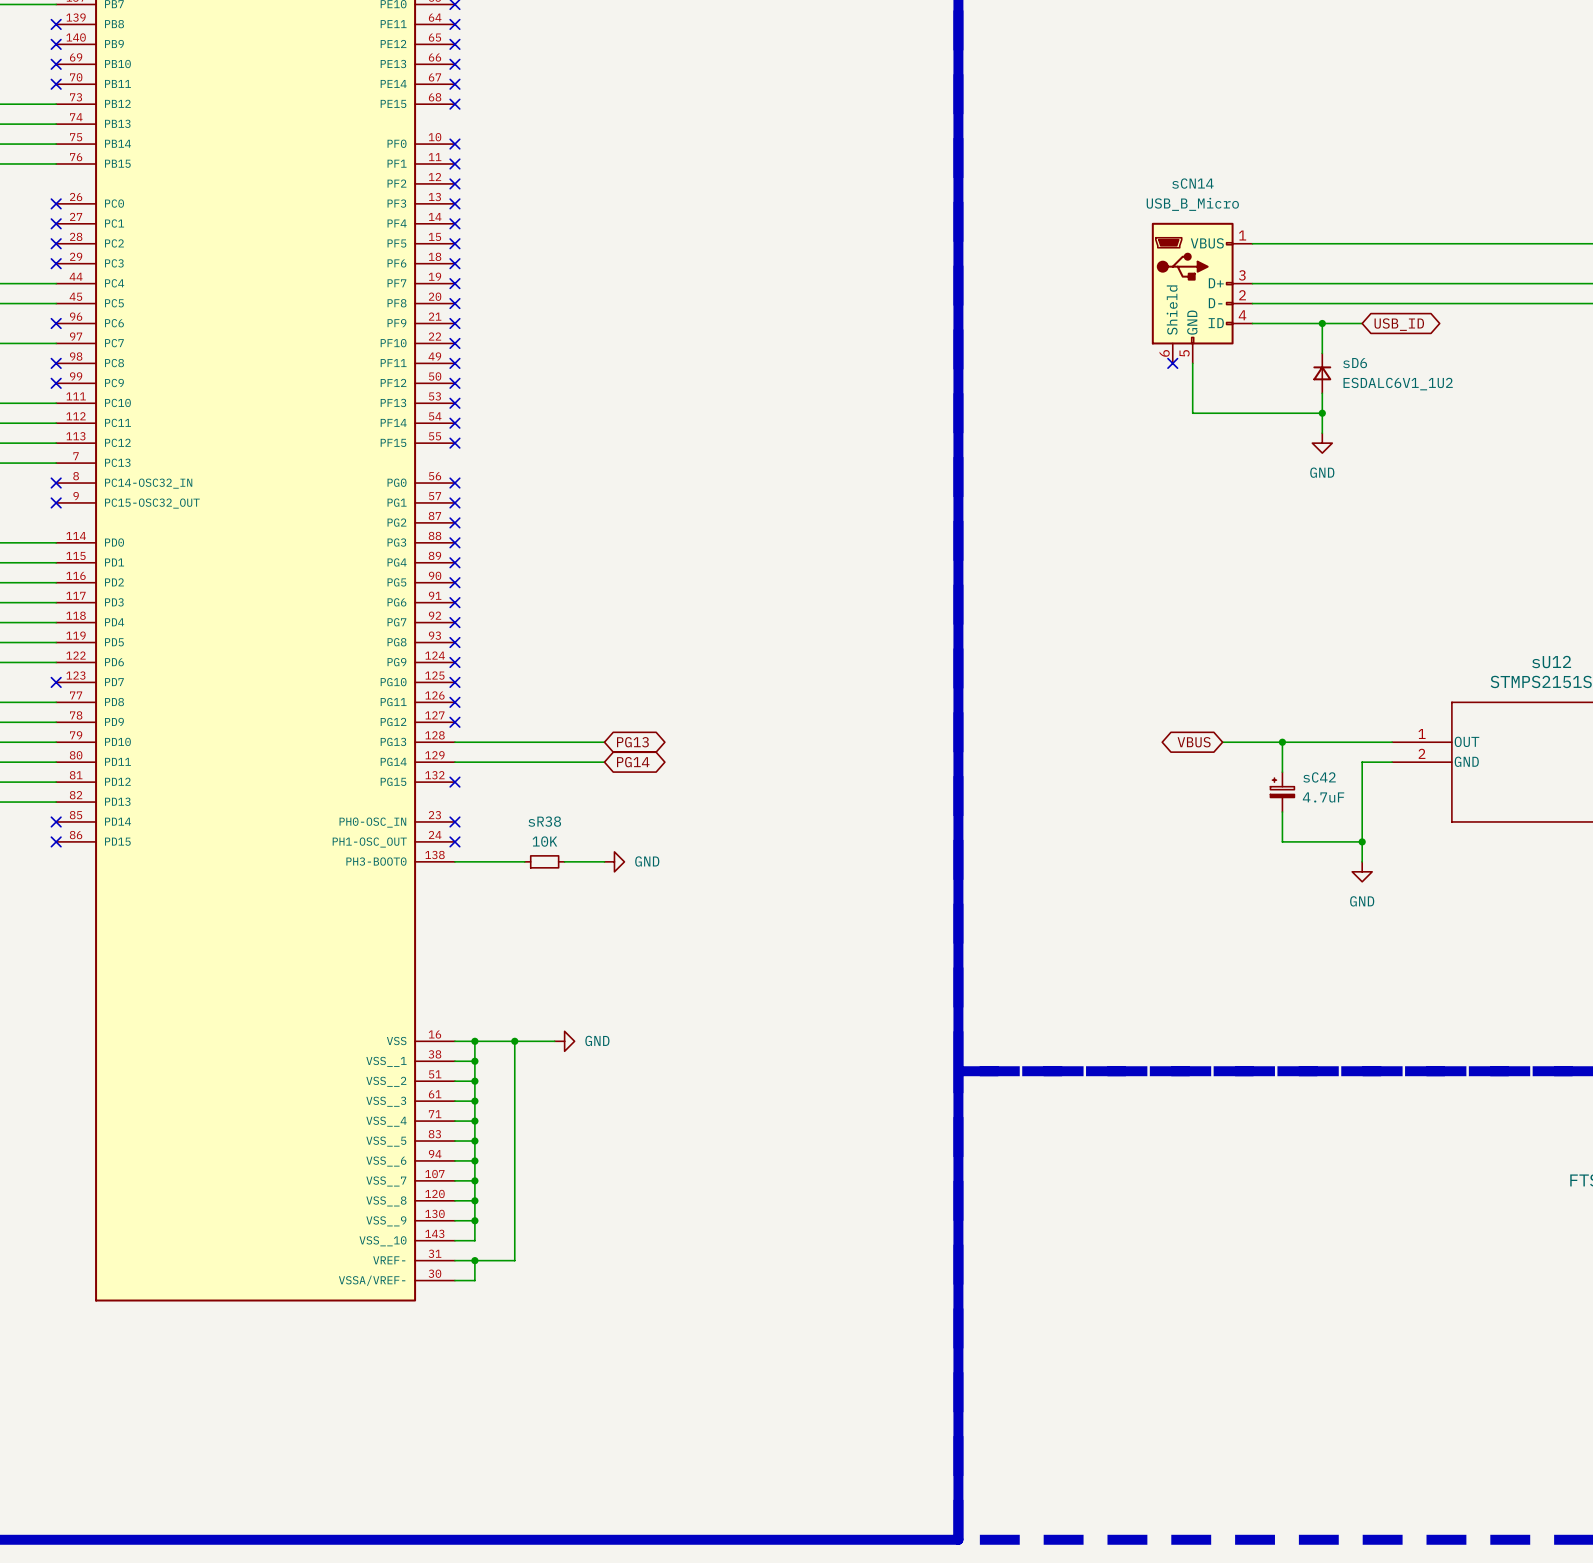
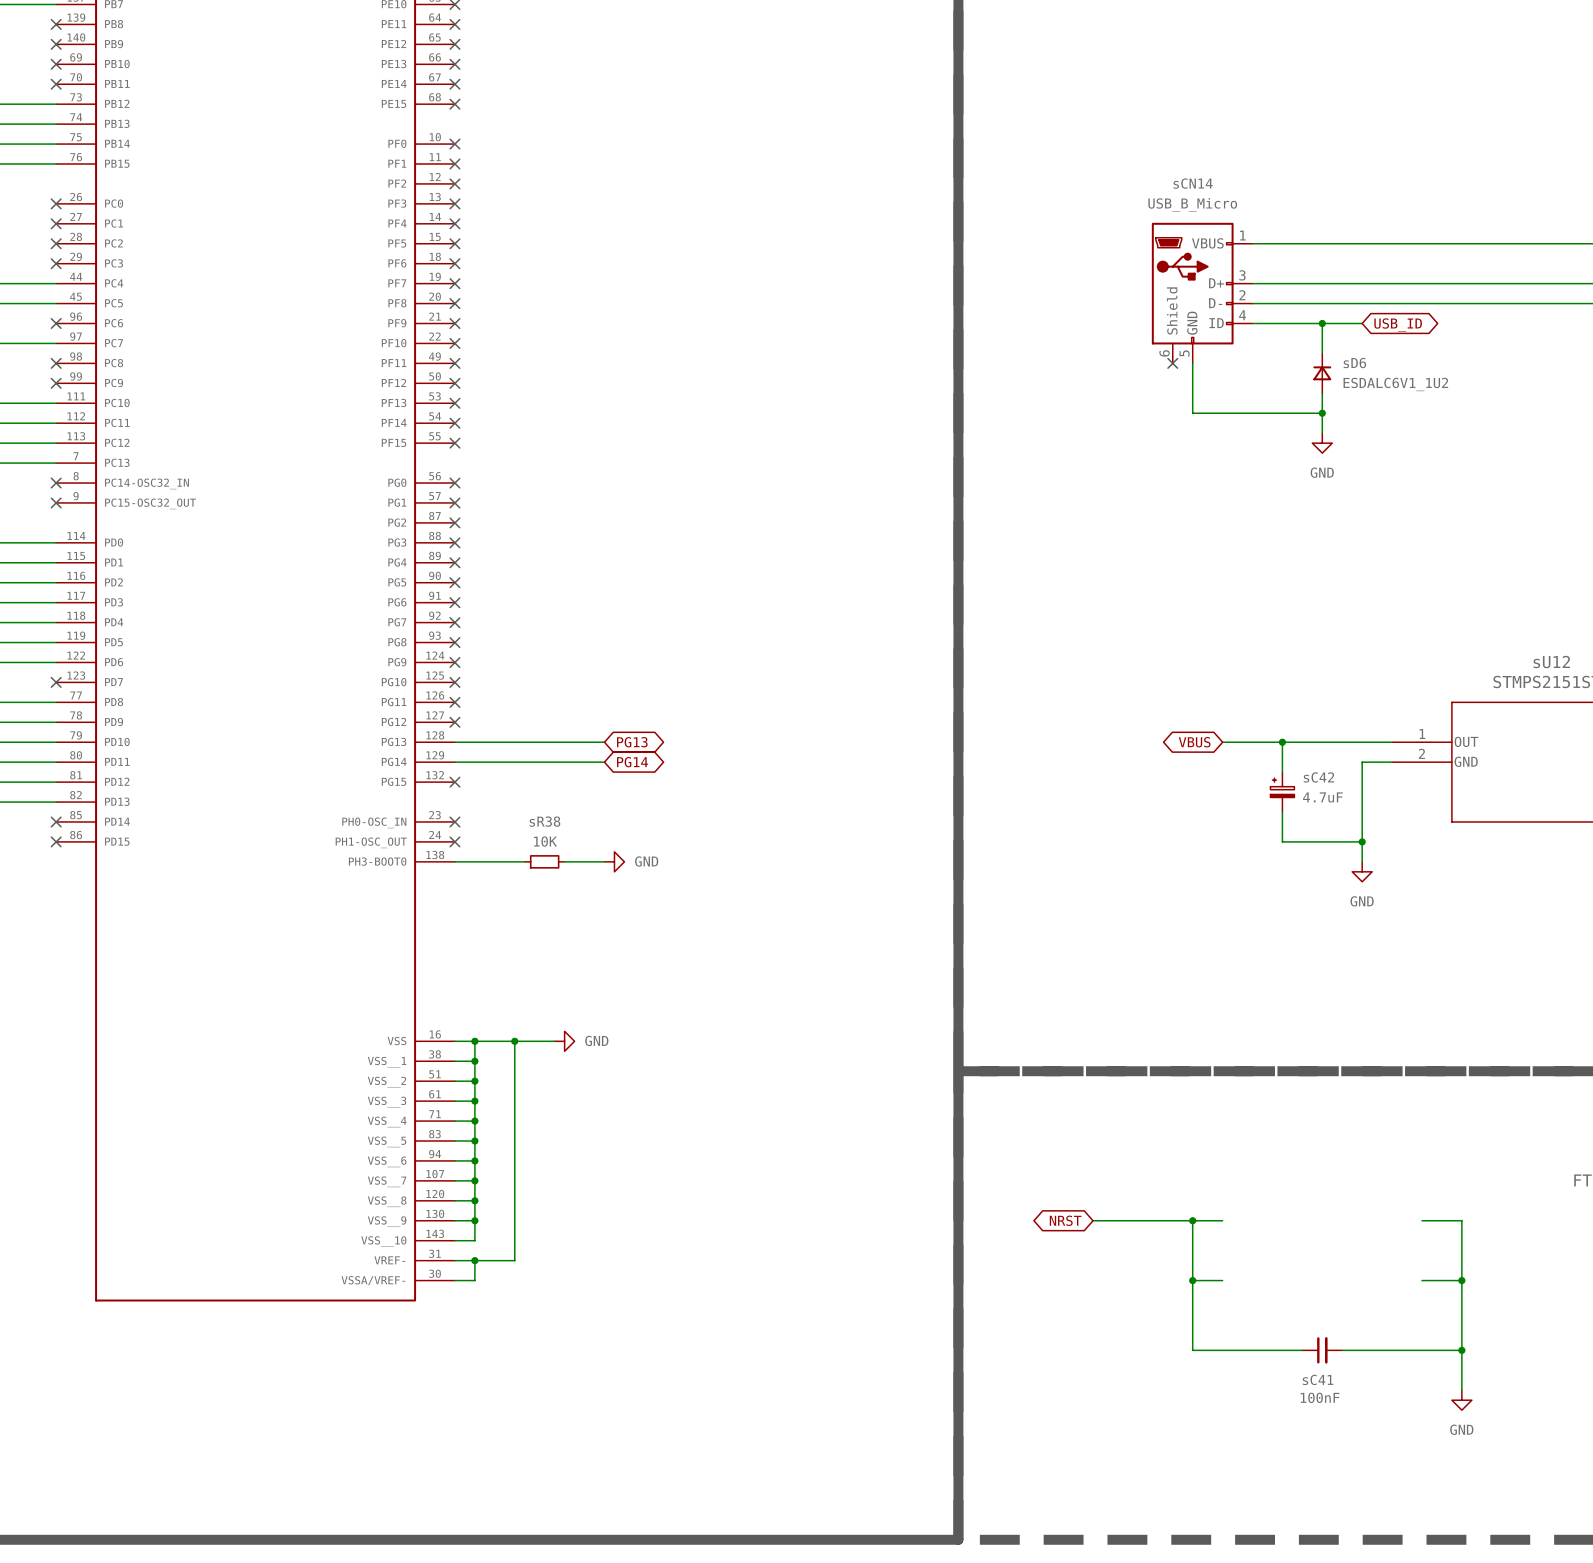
global label: none -> NRST (1065, 1220)
wire: none -> (1093, 1220) (1222, 1220)
wire: none -> (1192, 1220) (1192, 1350) (1302, 1350)
junction: none -> (1192, 1220)
wire: none -> (1422, 1220) (1461, 1220) (1461, 1390)
wire: none -> (1192, 1280) (1222, 1280)
junction: none -> (1192, 1280)
wire: none -> (1422, 1280) (1461, 1280)
junction: none -> (1461, 1280)
sC41: none -> 100nF (1322, 1350)
wire: none -> (1342, 1350) (1461, 1350)
junction: none -> (1461, 1350)
power symbol: none -> GND (1461, 1400)

